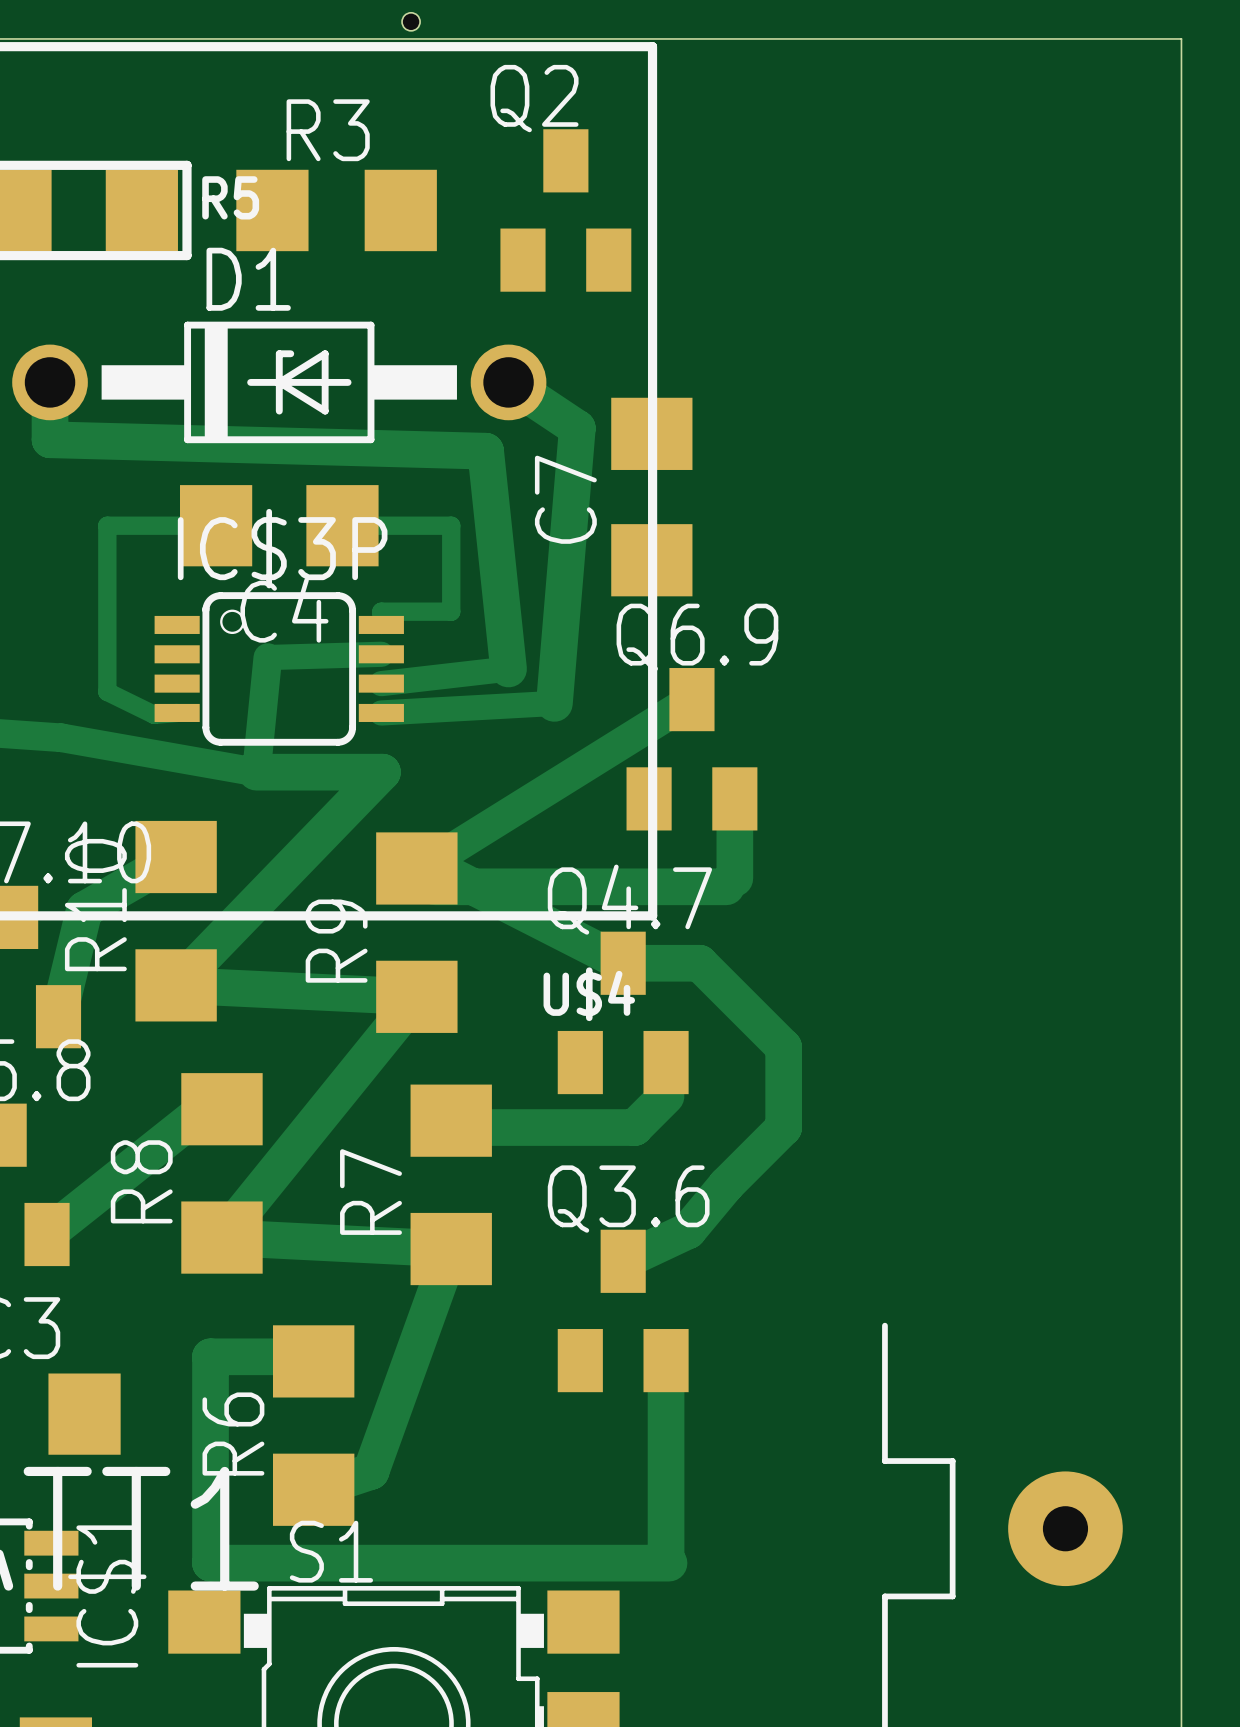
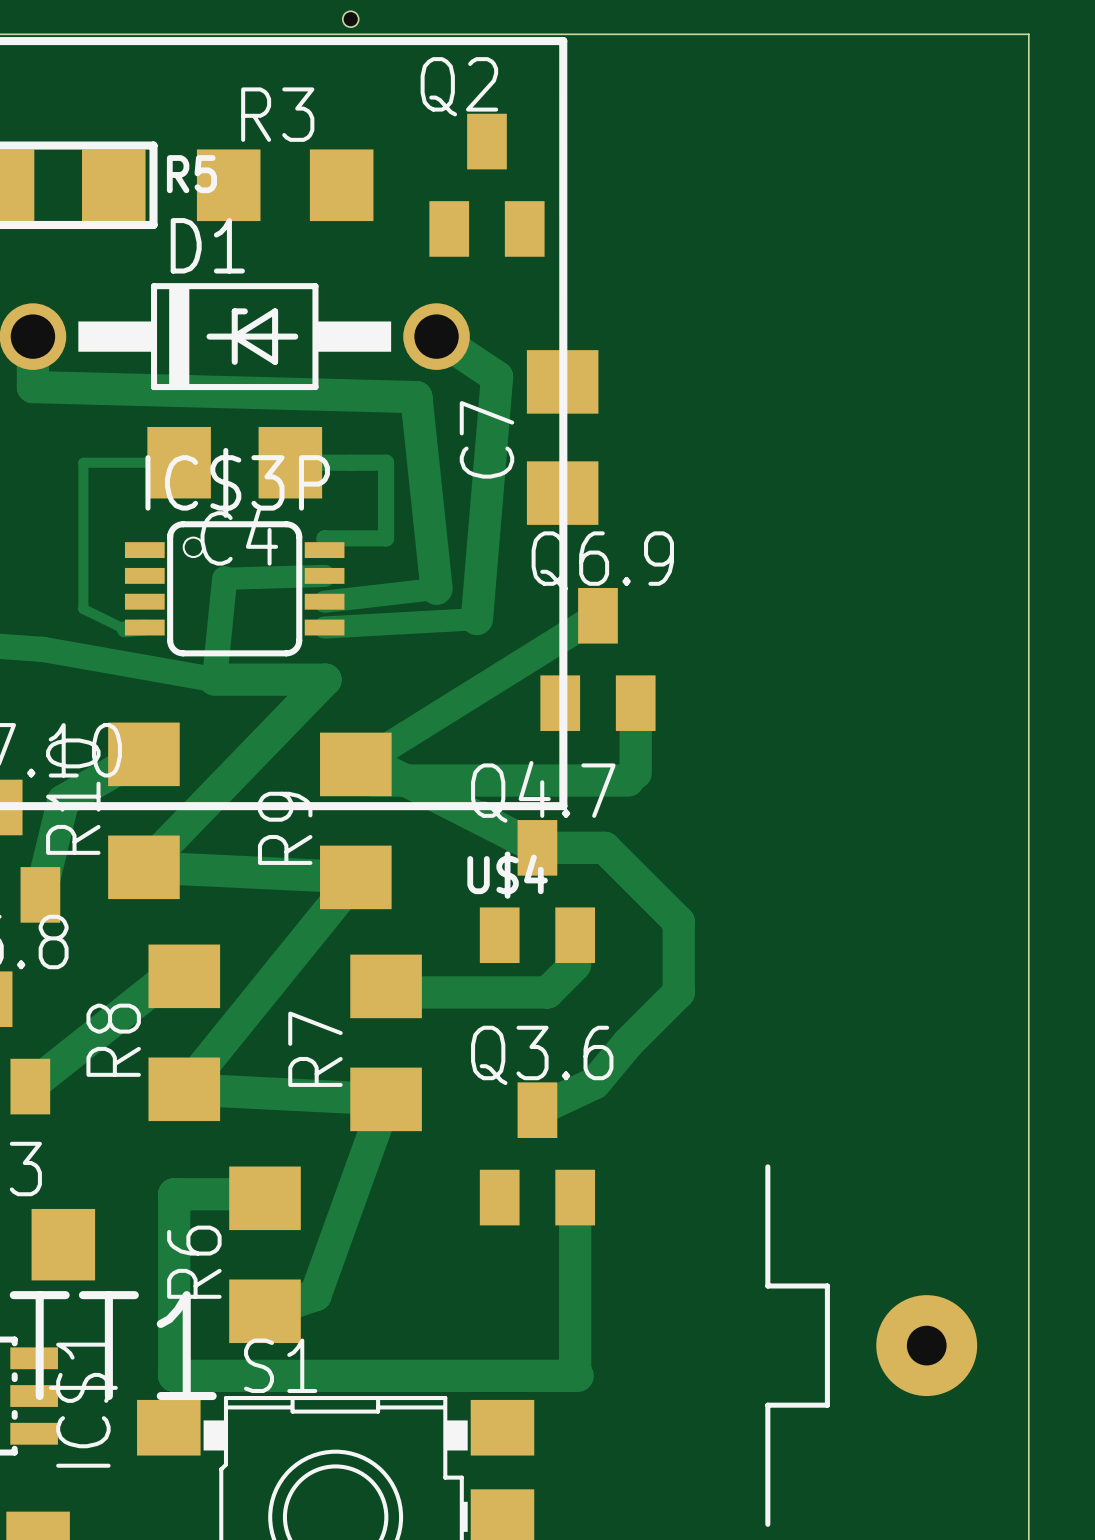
track width: thick (216, 525) (107, 525) (107, 691) (154, 714) -> thin (179, 462) (83, 462) (83, 609) (124, 629)

